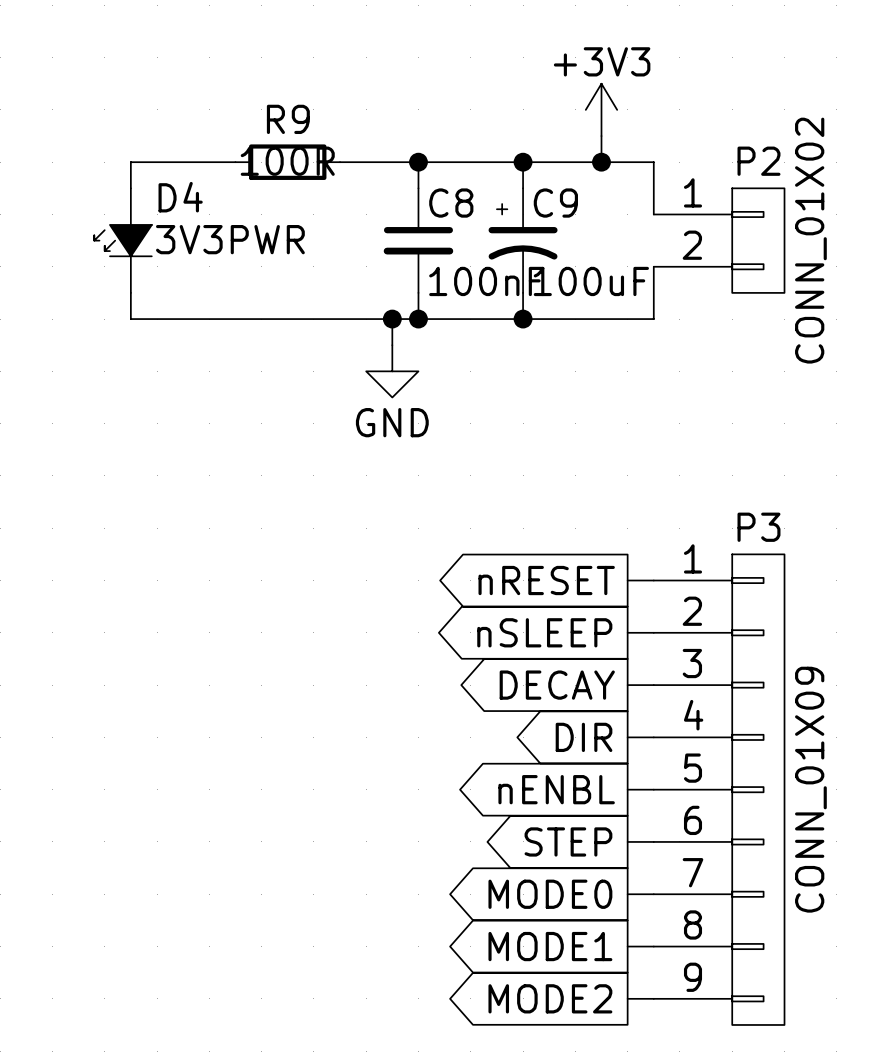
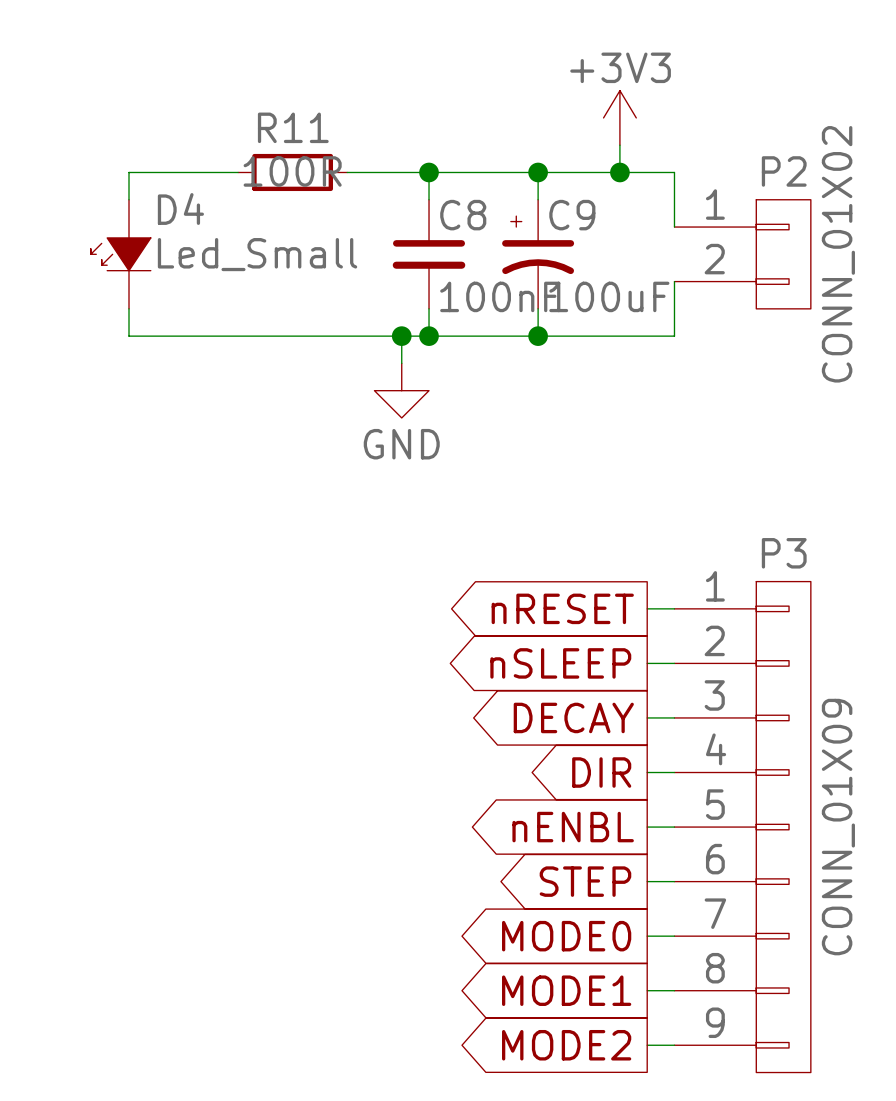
R9 name: R9 (288, 119) -> R11 (293, 127)
D4 value: 3V3PWR (230, 239) -> Led_Small (257, 254)

